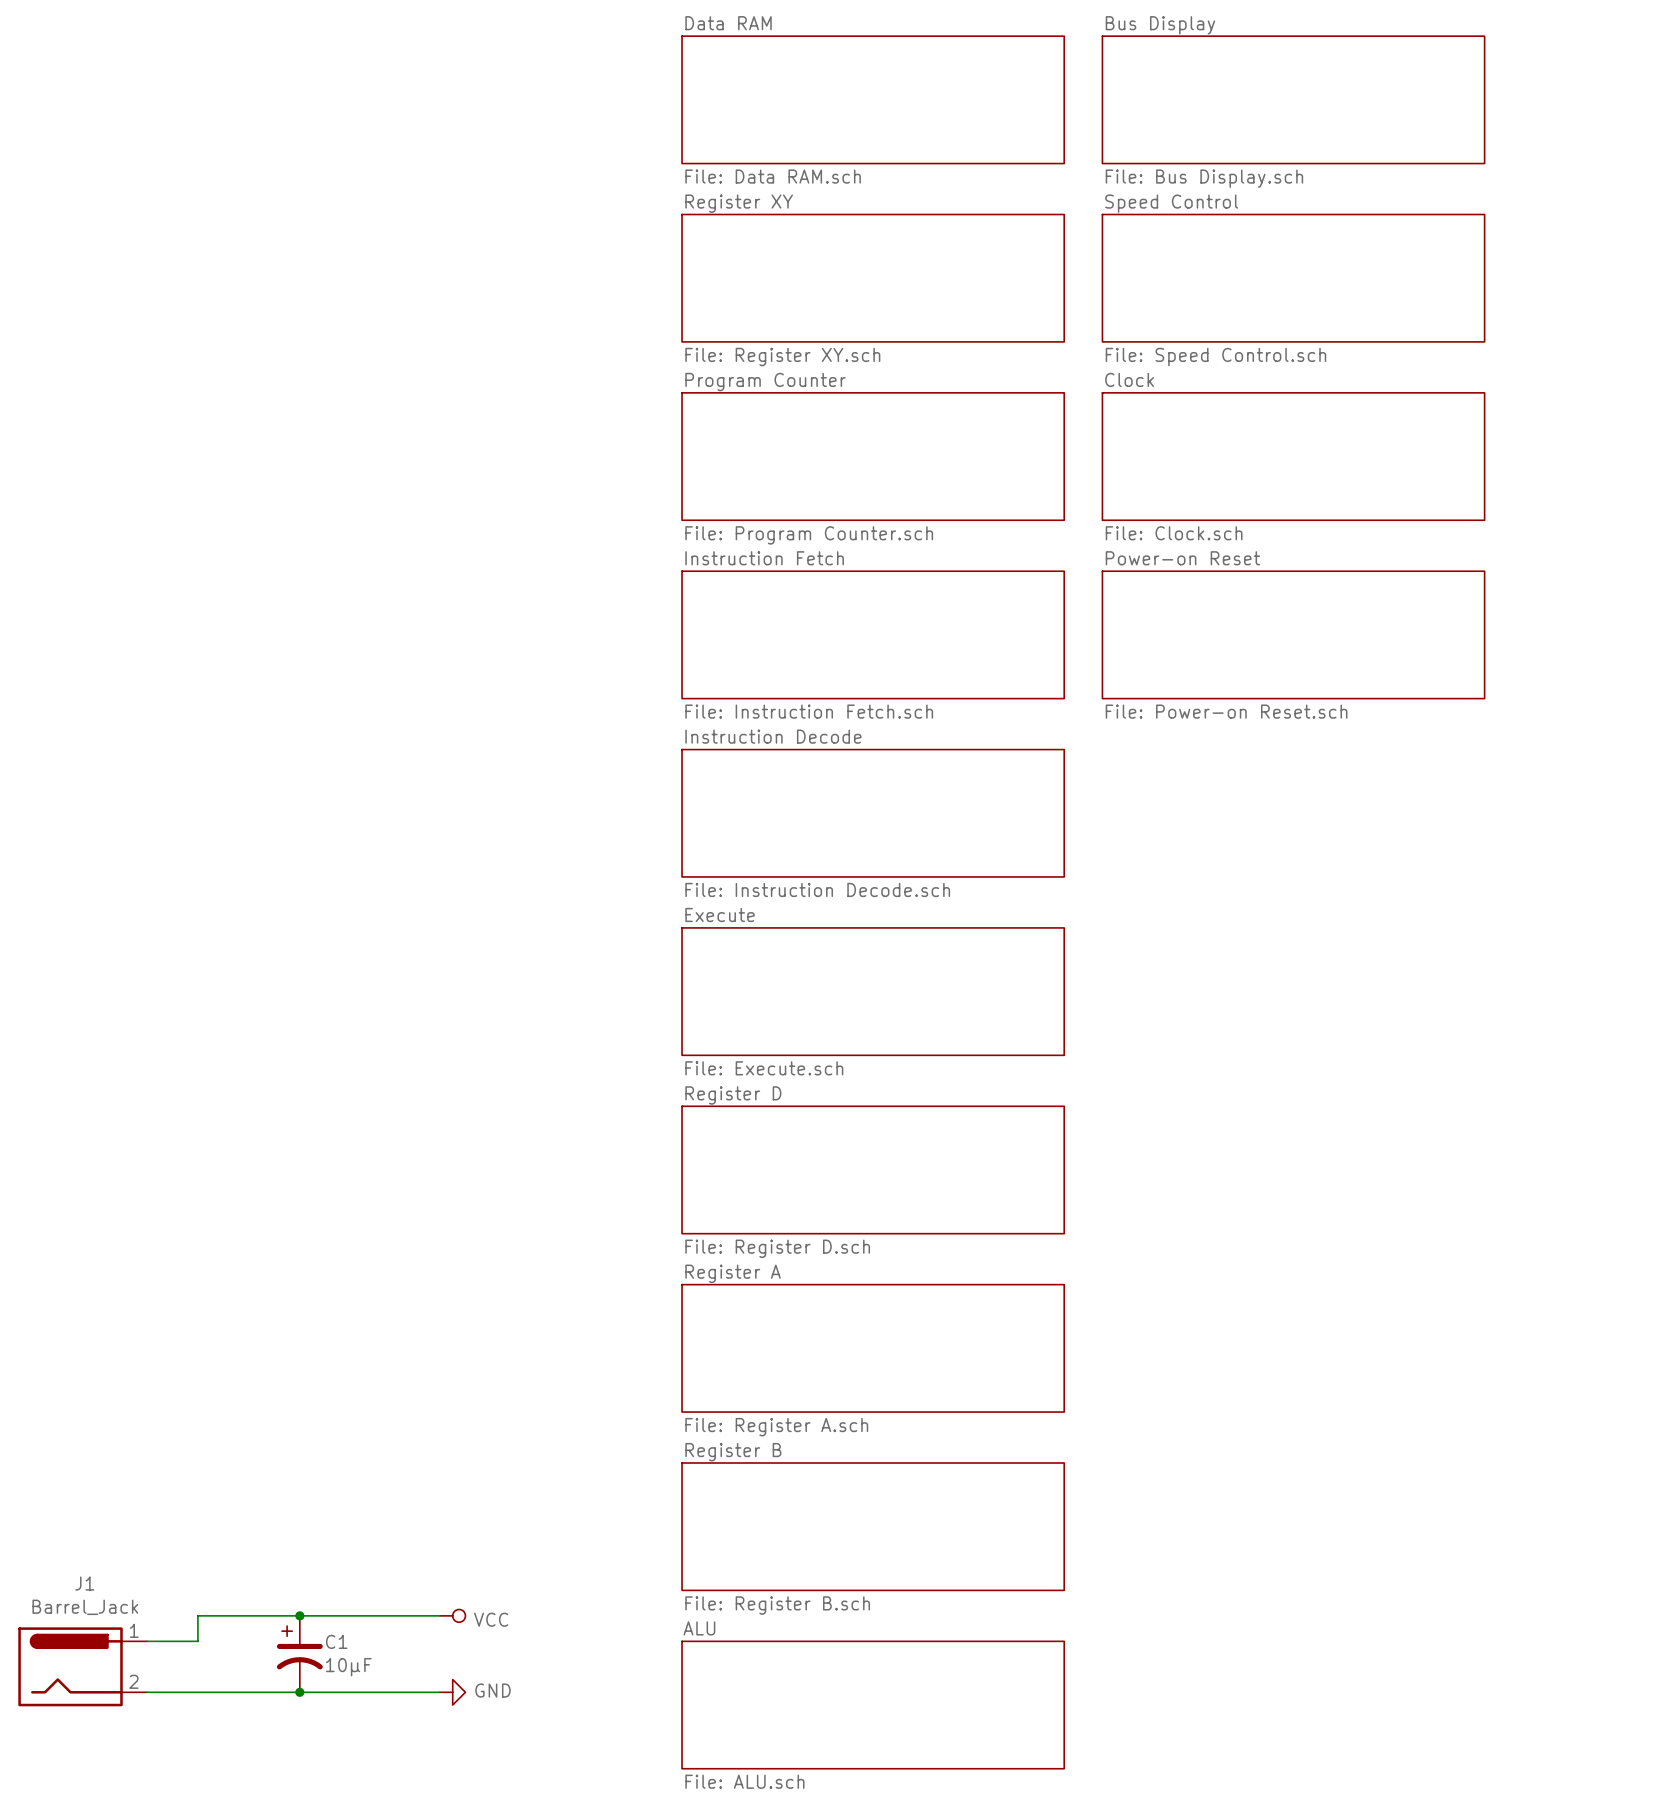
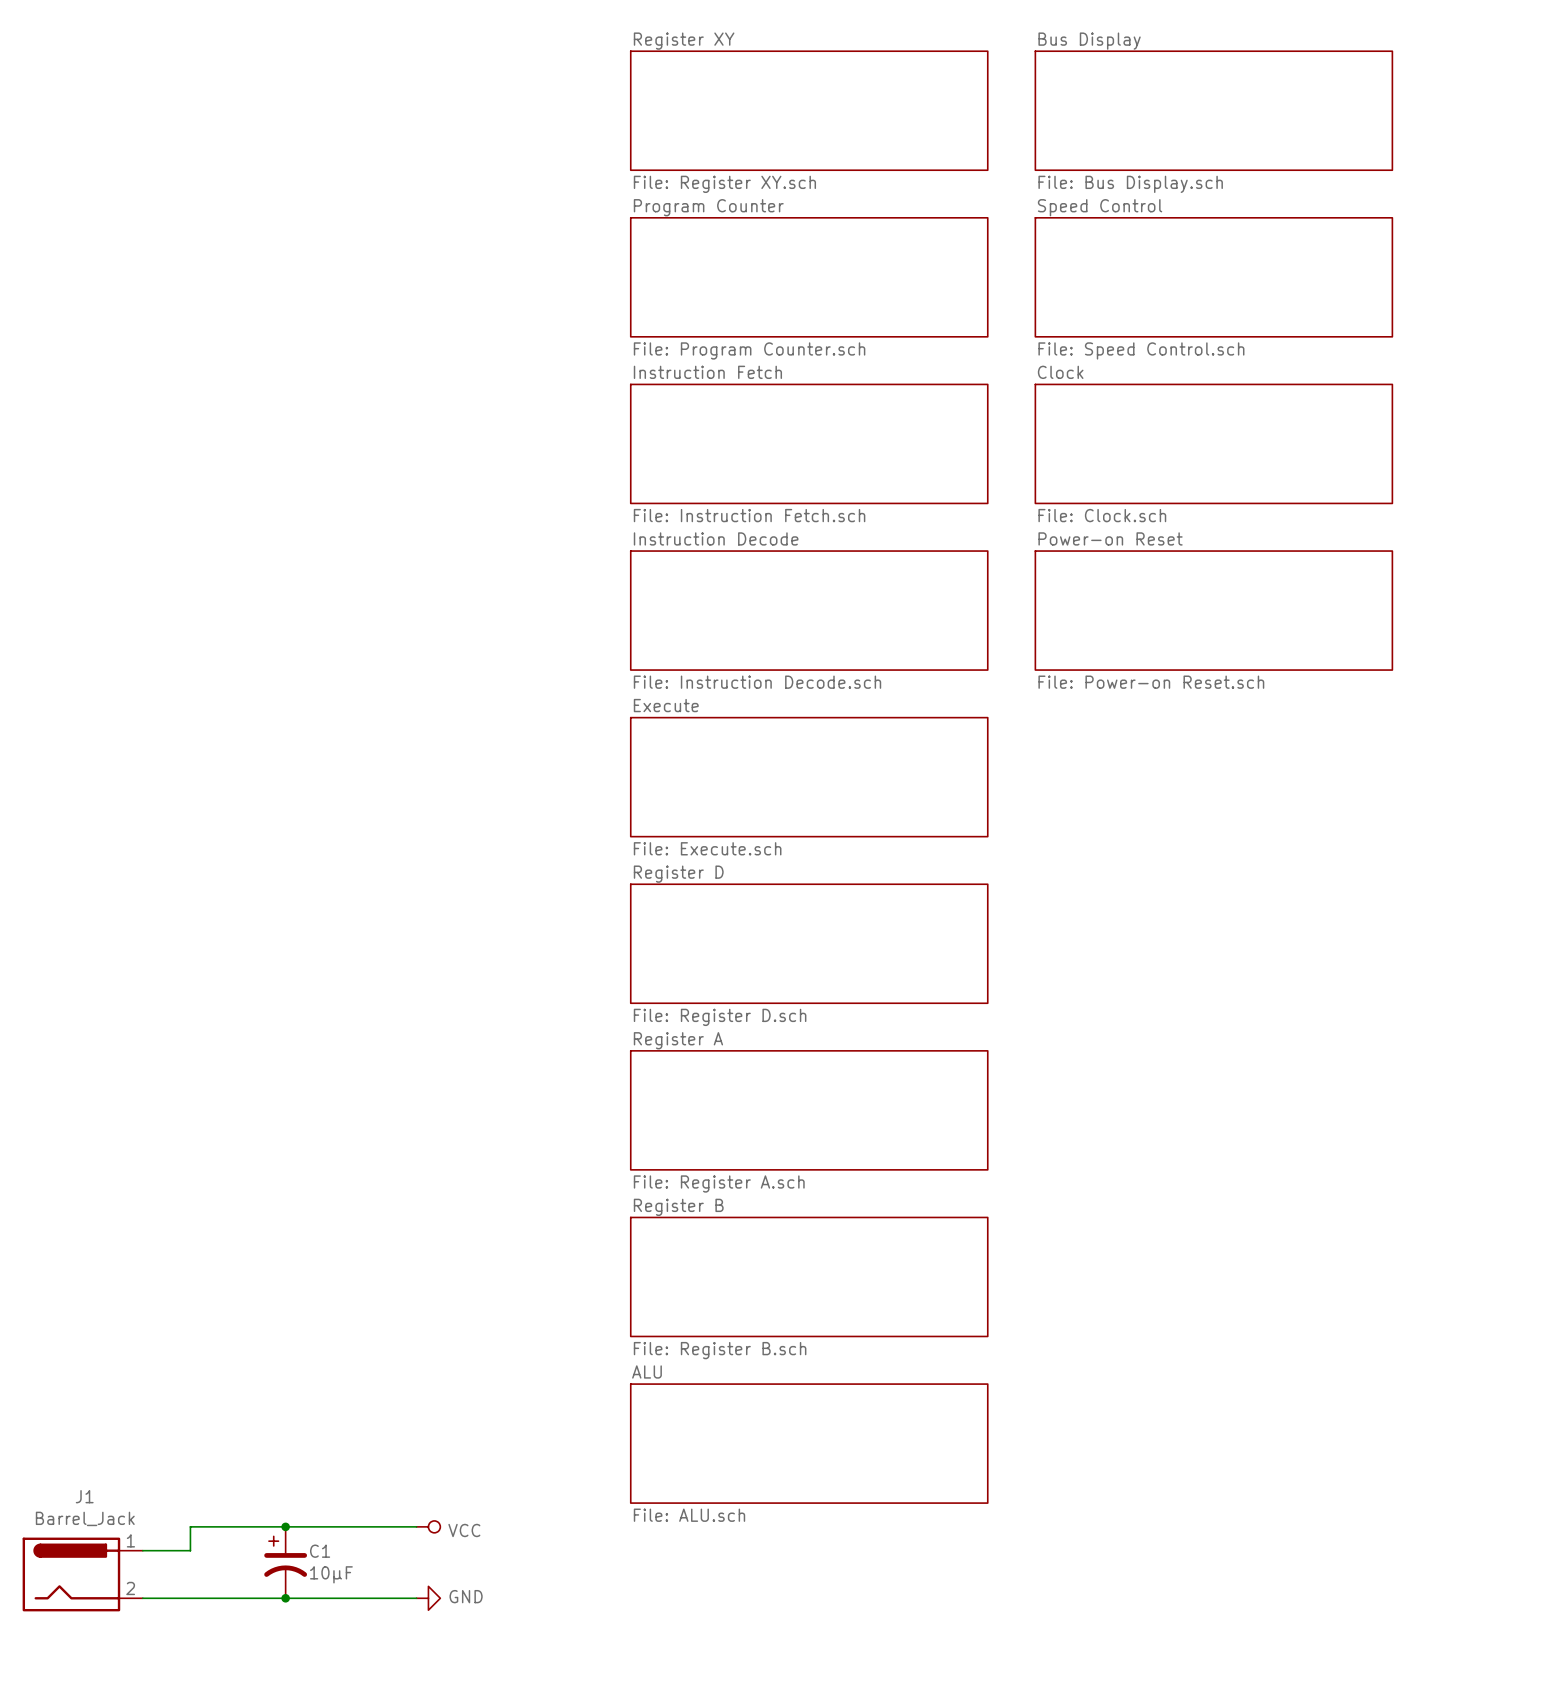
sheet Data RAM: File: Data RAM.sch (873, 99) -> none
sheet Register XY position: (873, 278) -> (809, 110)
sheet Program Counter position: (873, 456) -> (809, 277)
sheet Instruction Fetch position: (873, 634) -> (809, 443)
sheet Instruction Decode position: (873, 813) -> (809, 610)
sheet Execute position: (873, 991) -> (809, 777)
sheet Register D position: (873, 1169) -> (809, 943)
sheet Register A position: (873, 1348) -> (809, 1110)
sheet Register B position: (873, 1526) -> (809, 1276)
sheet ALU position: (873, 1705) -> (809, 1443)

